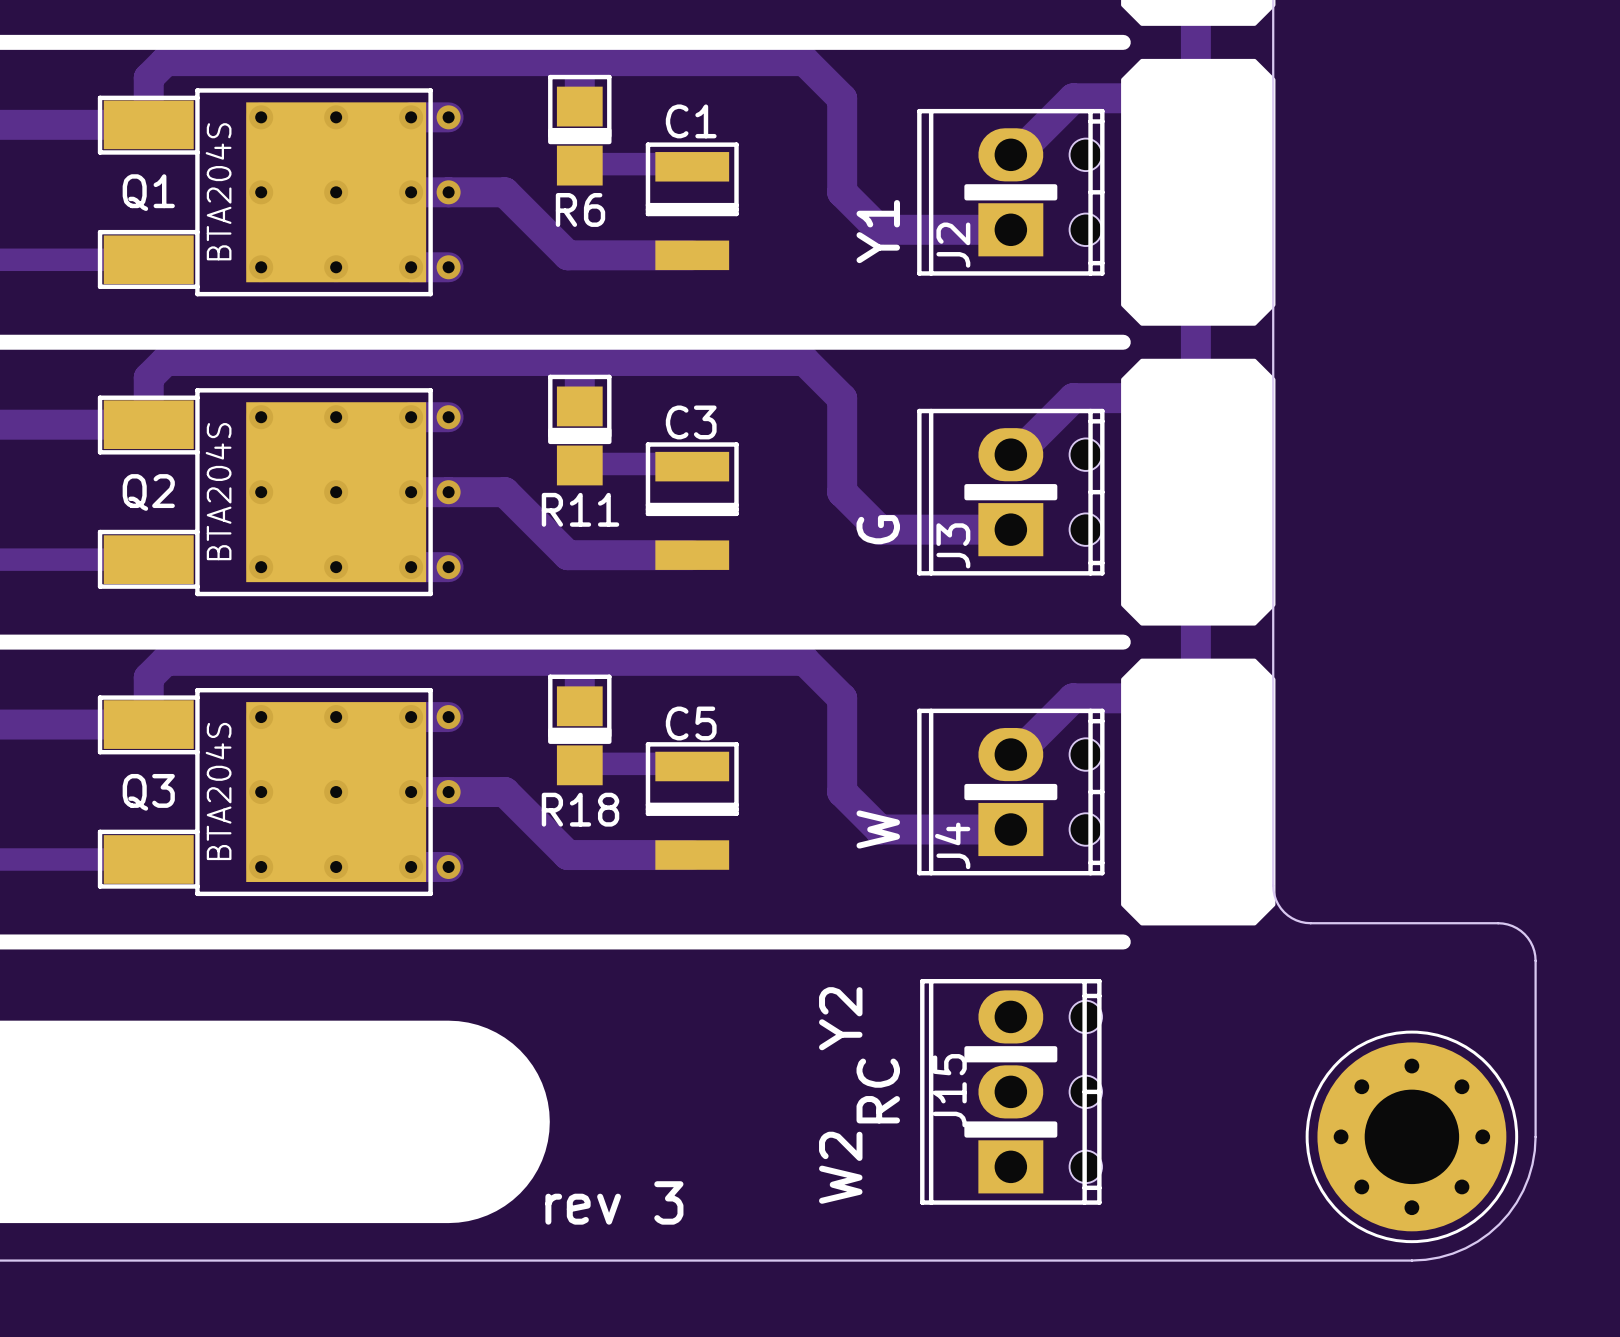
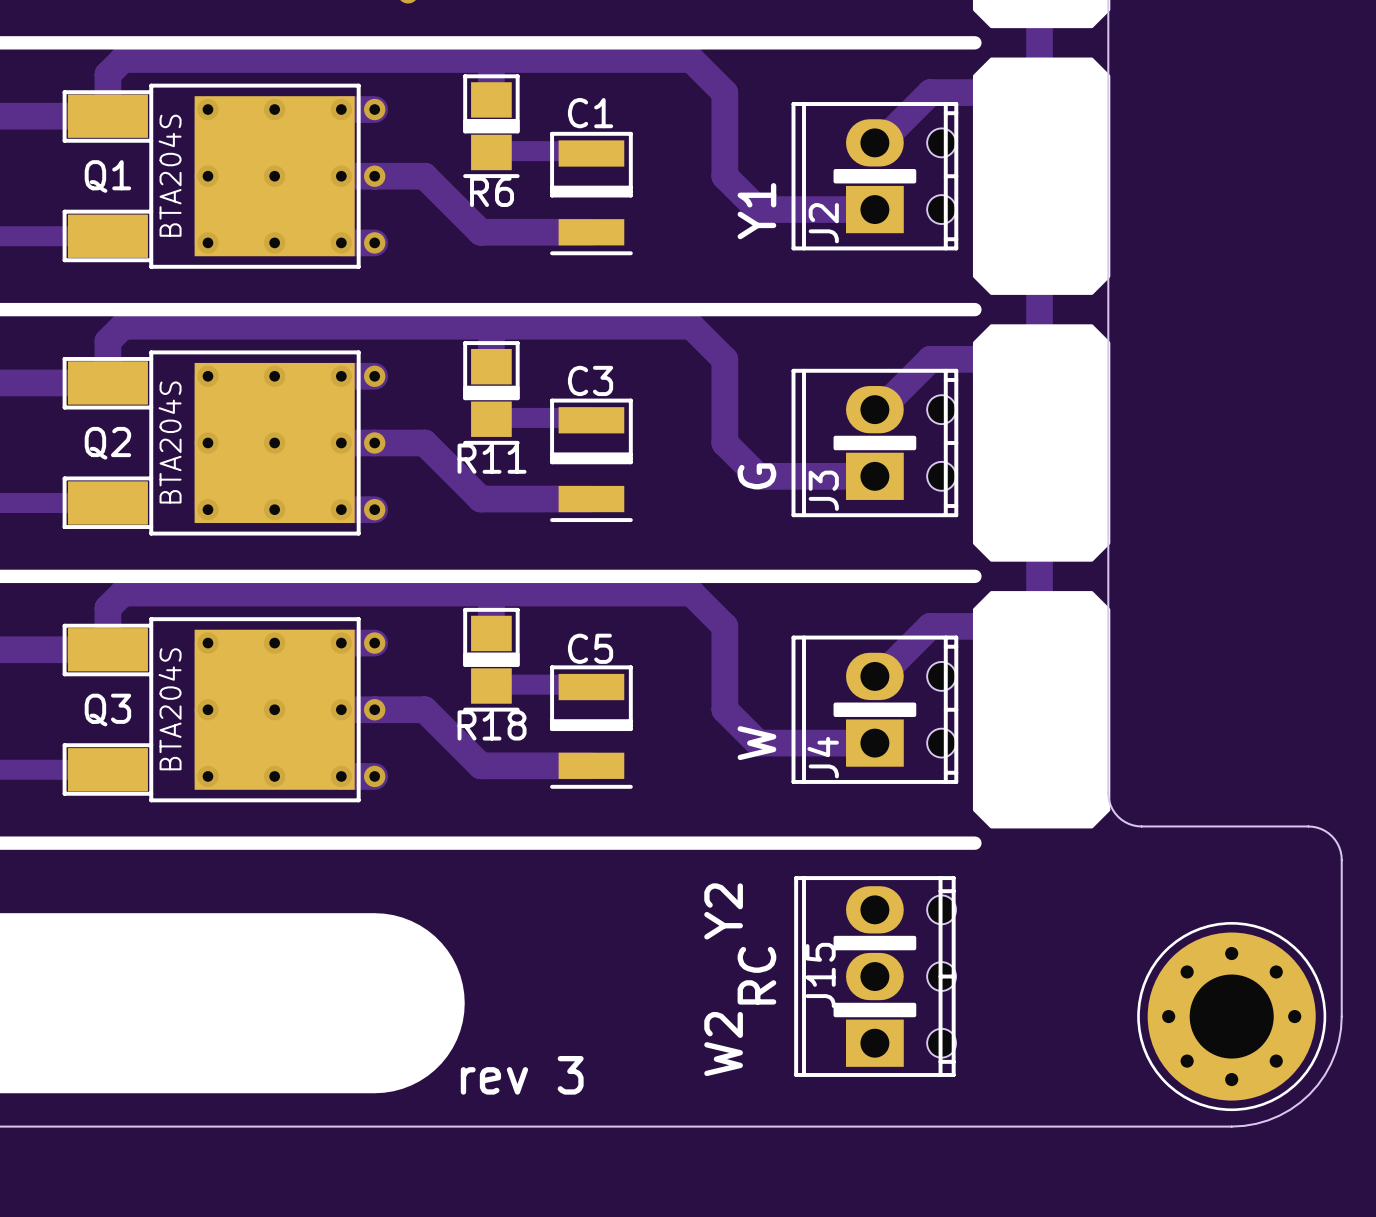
R6 footprint: [548, 74, 612, 186] -> [463, 74, 520, 179]
C1 footprint: [645, 142, 739, 271] -> [550, 131, 633, 256]
R11 footprint: [548, 374, 612, 486] -> [463, 341, 520, 445]
C3 footprint: [645, 442, 739, 570] -> [550, 398, 633, 523]
R18 footprint: [548, 674, 612, 786] -> [463, 607, 520, 712]
C5 footprint: [645, 742, 739, 870] -> [550, 665, 633, 789]

